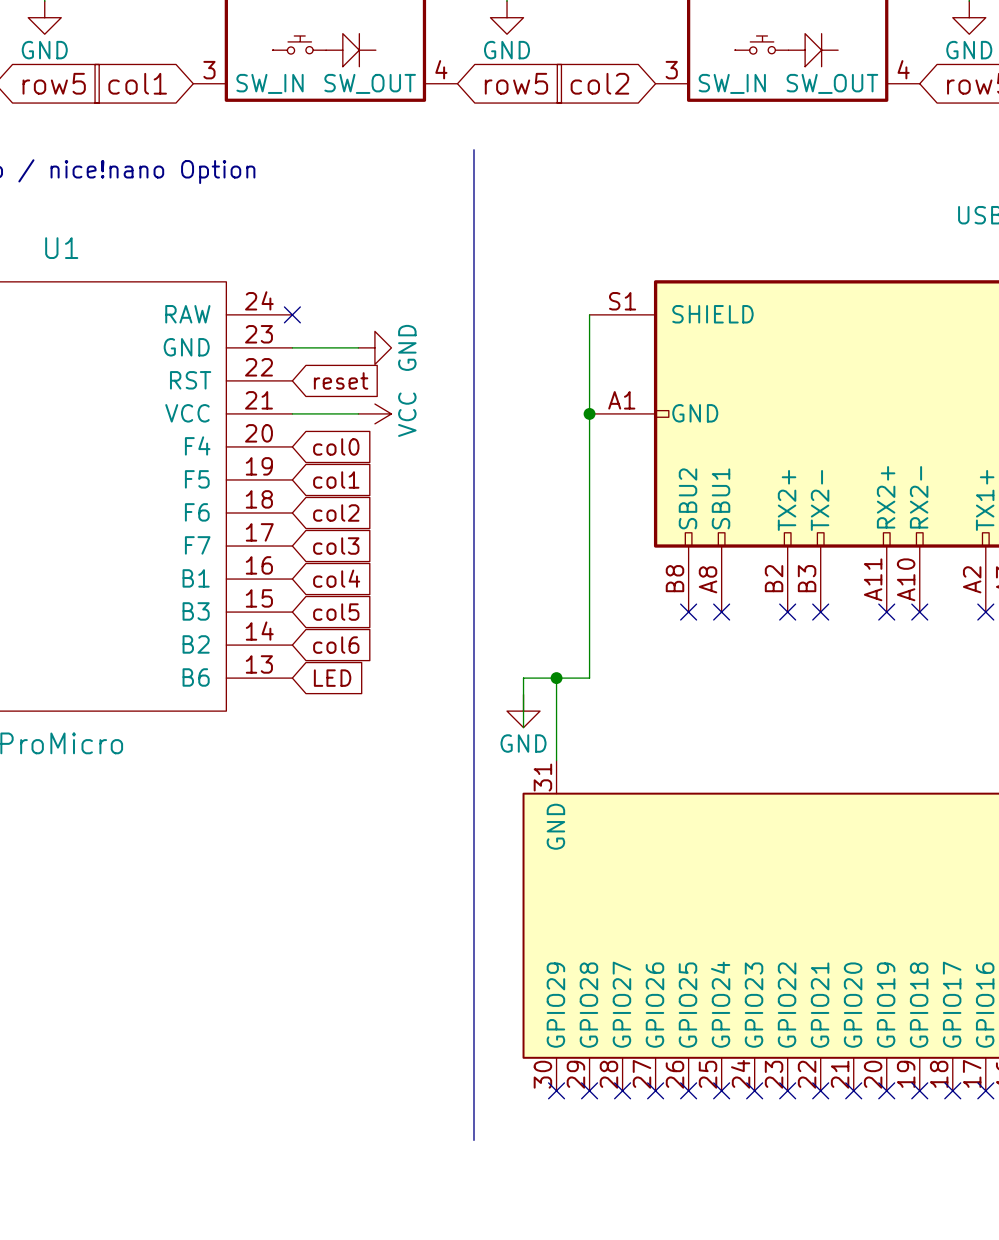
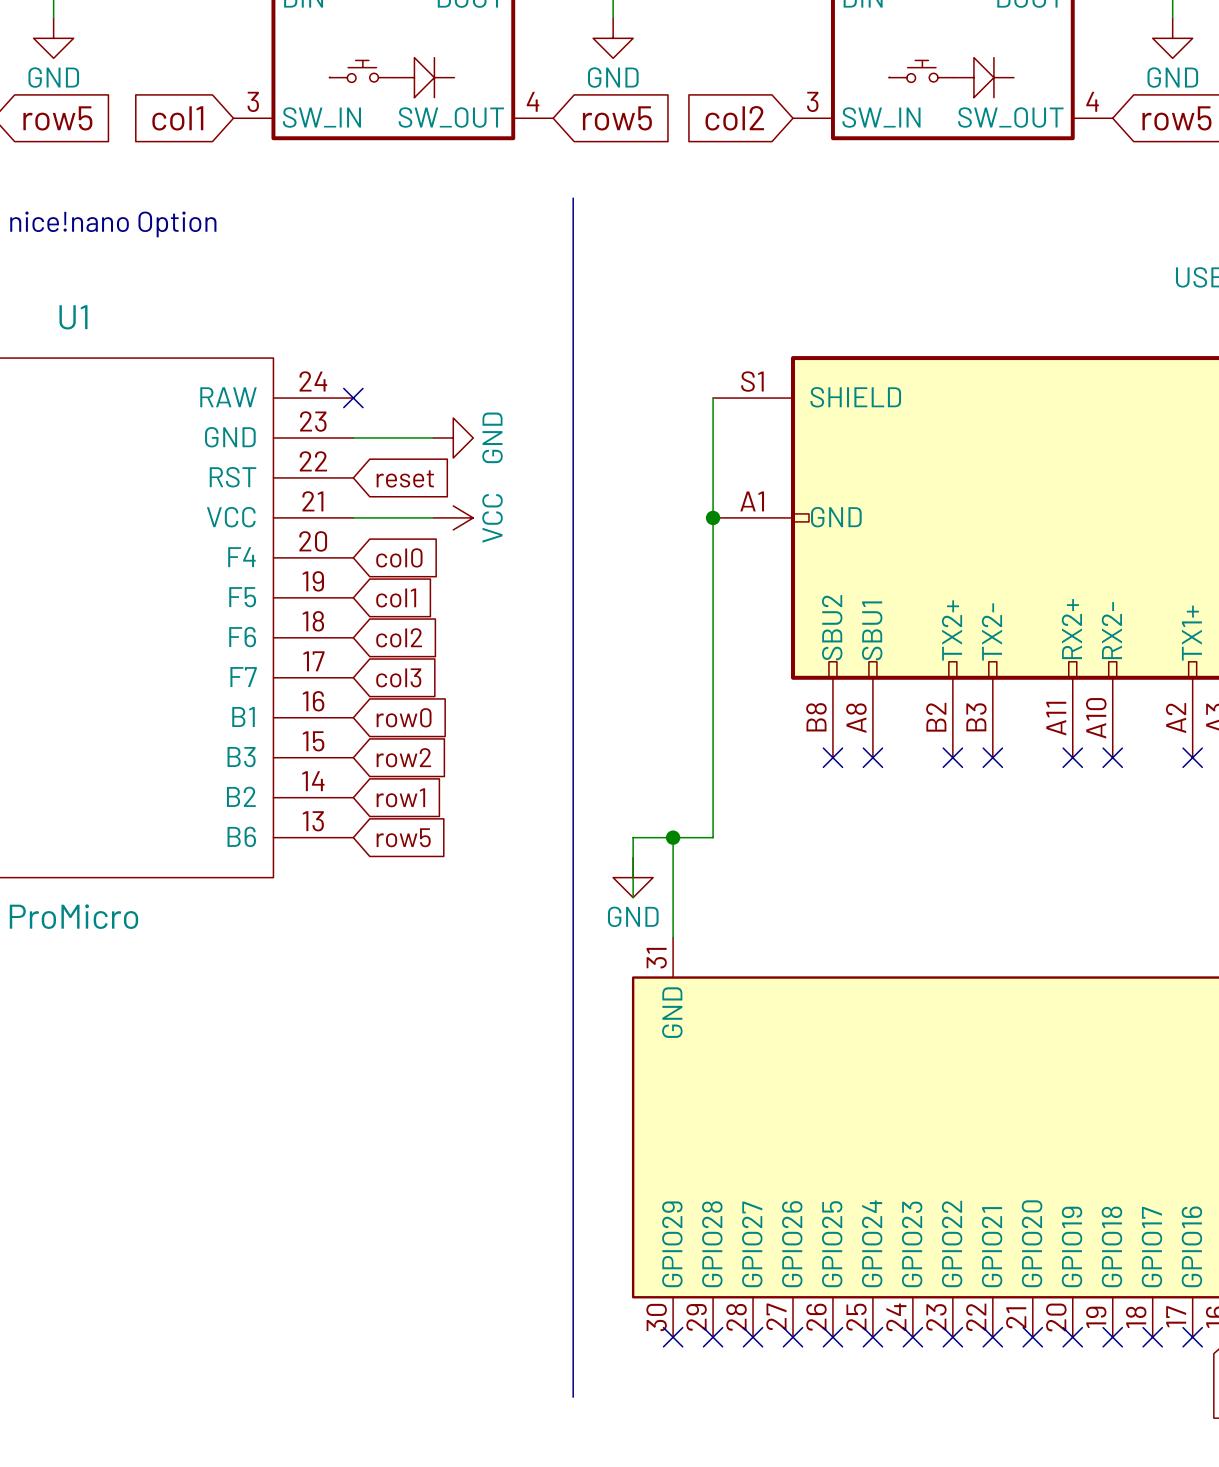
global label: col4 (336, 578) -> row0 (404, 717)
global label: col5 (336, 612) -> row2 (403, 757)
global label: col6 (336, 645) -> row1 (400, 797)
global label: LED (332, 678) -> row5 (403, 837)

